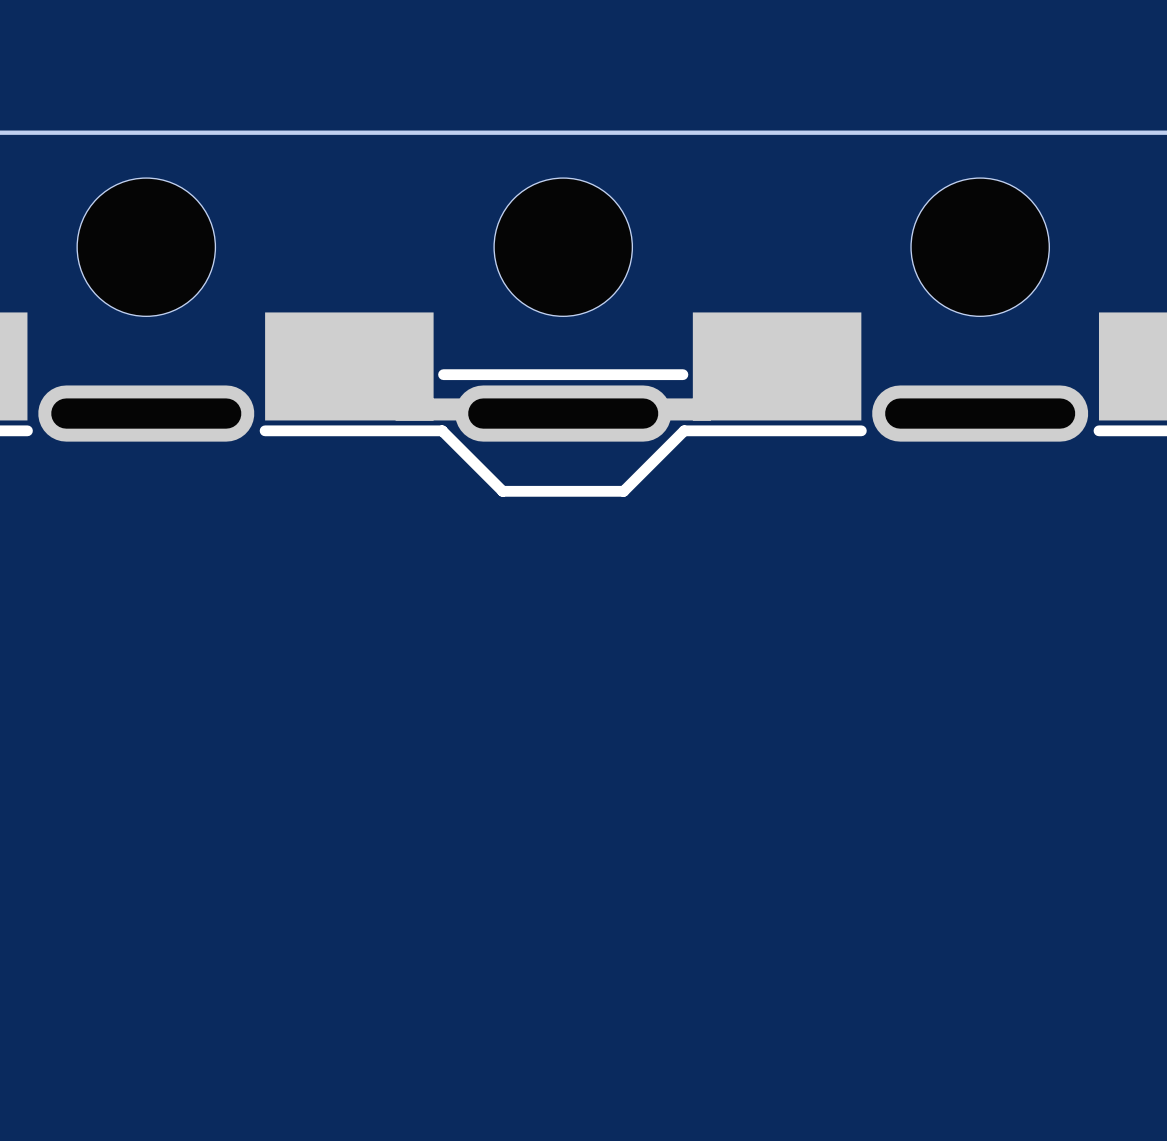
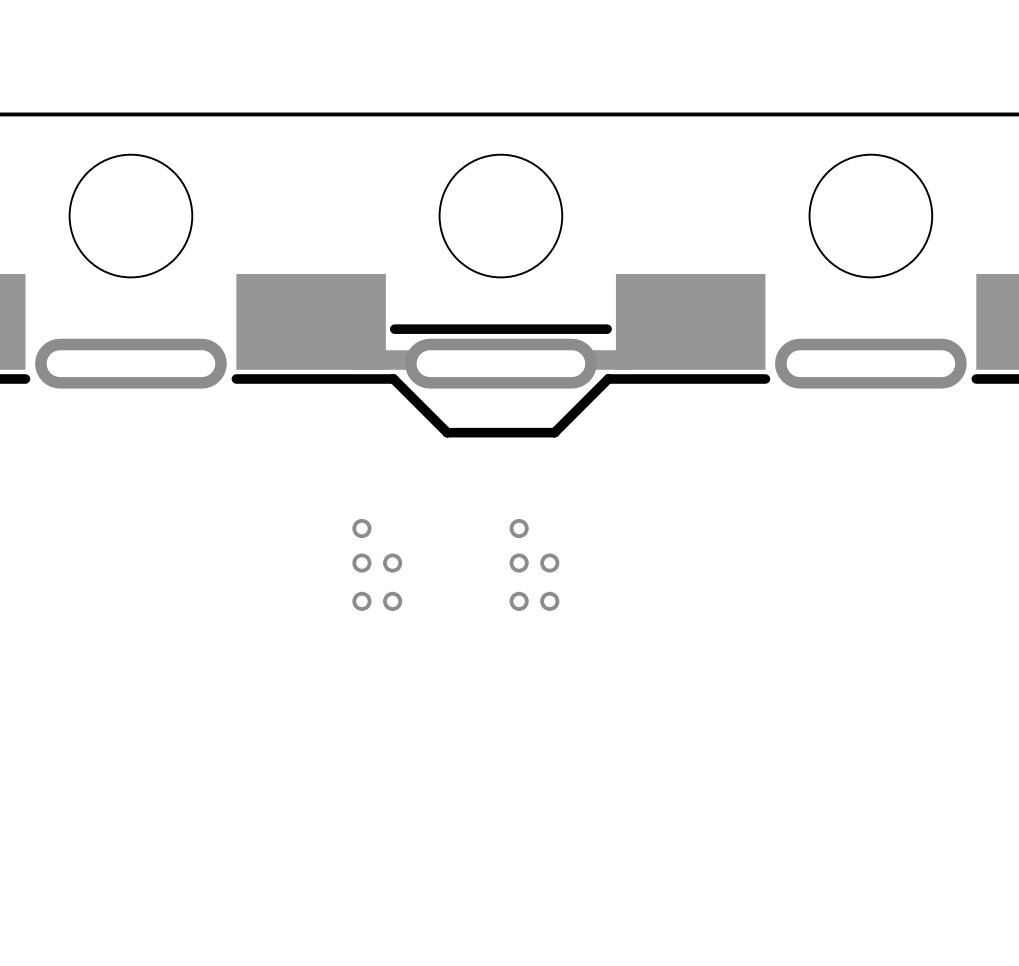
via: none -> (361, 528)
via: none -> (519, 528)
via: none -> (361, 563)
via: none -> (392, 563)
via: none -> (519, 563)
via: none -> (549, 563)
via: none -> (361, 601)
via: none -> (392, 601)
via: none -> (519, 601)
via: none -> (549, 601)

